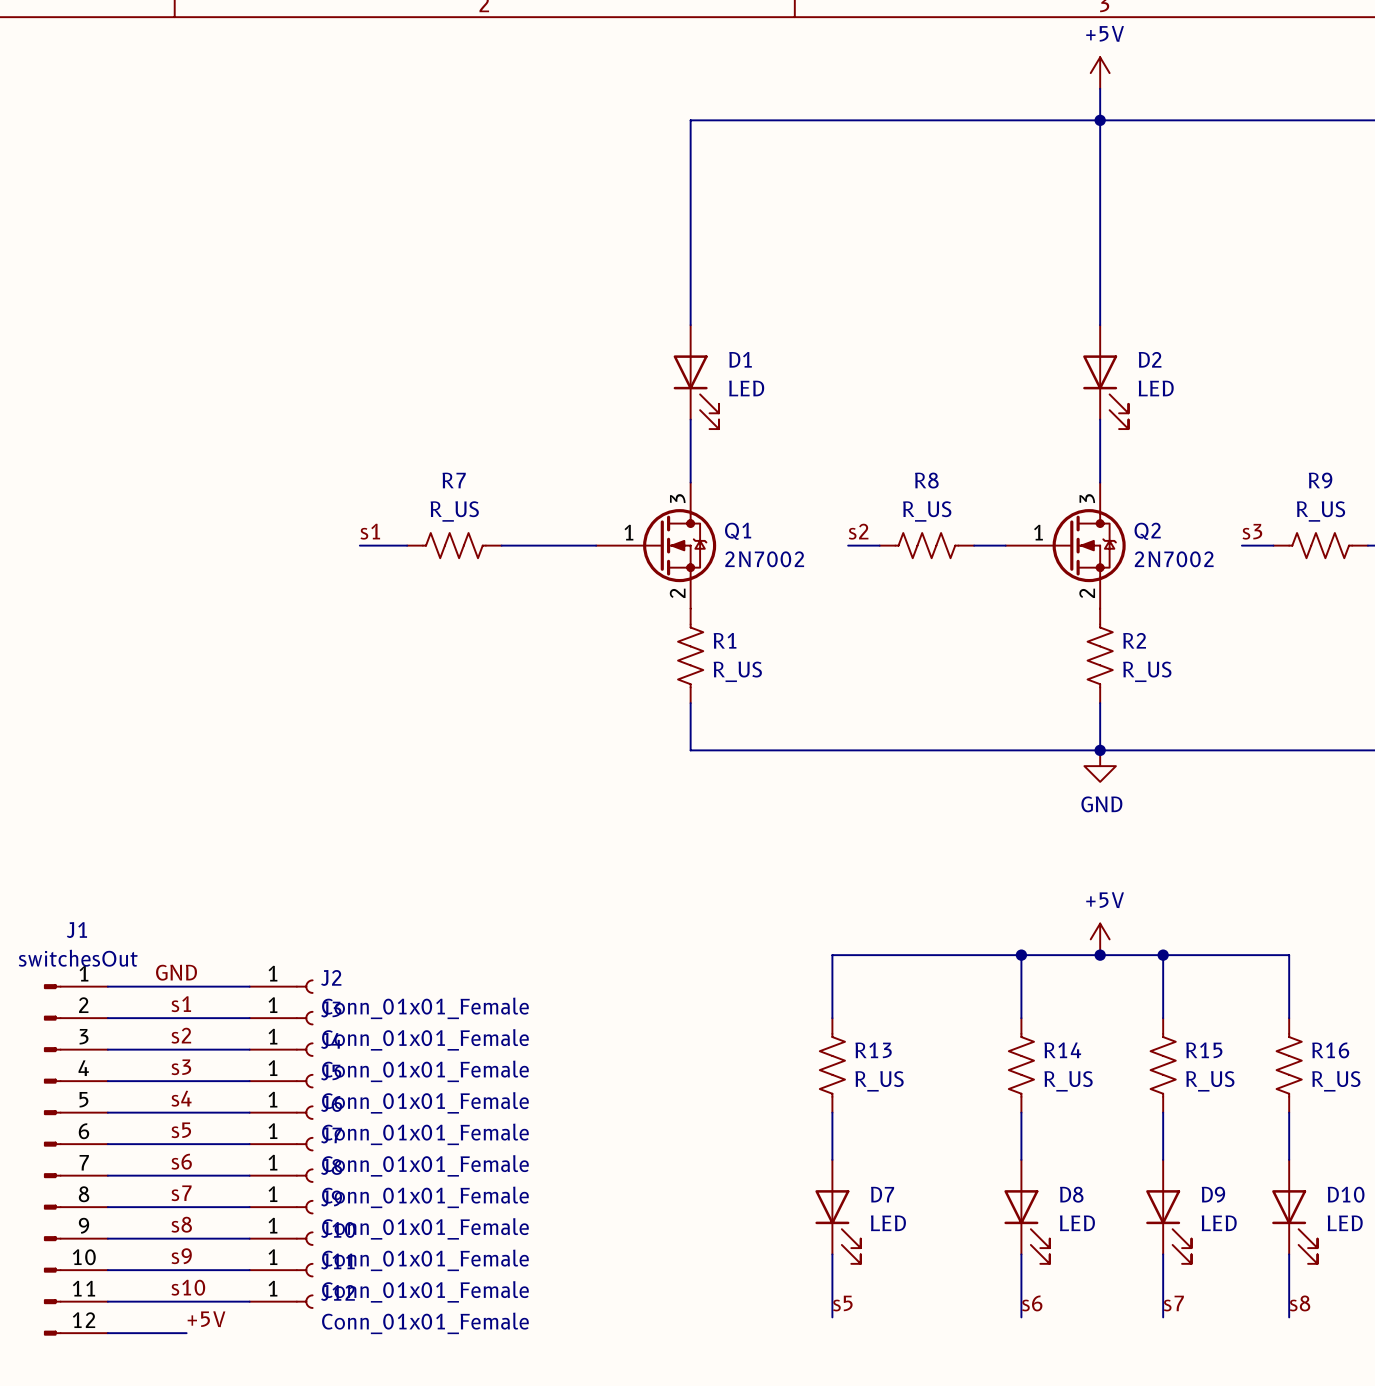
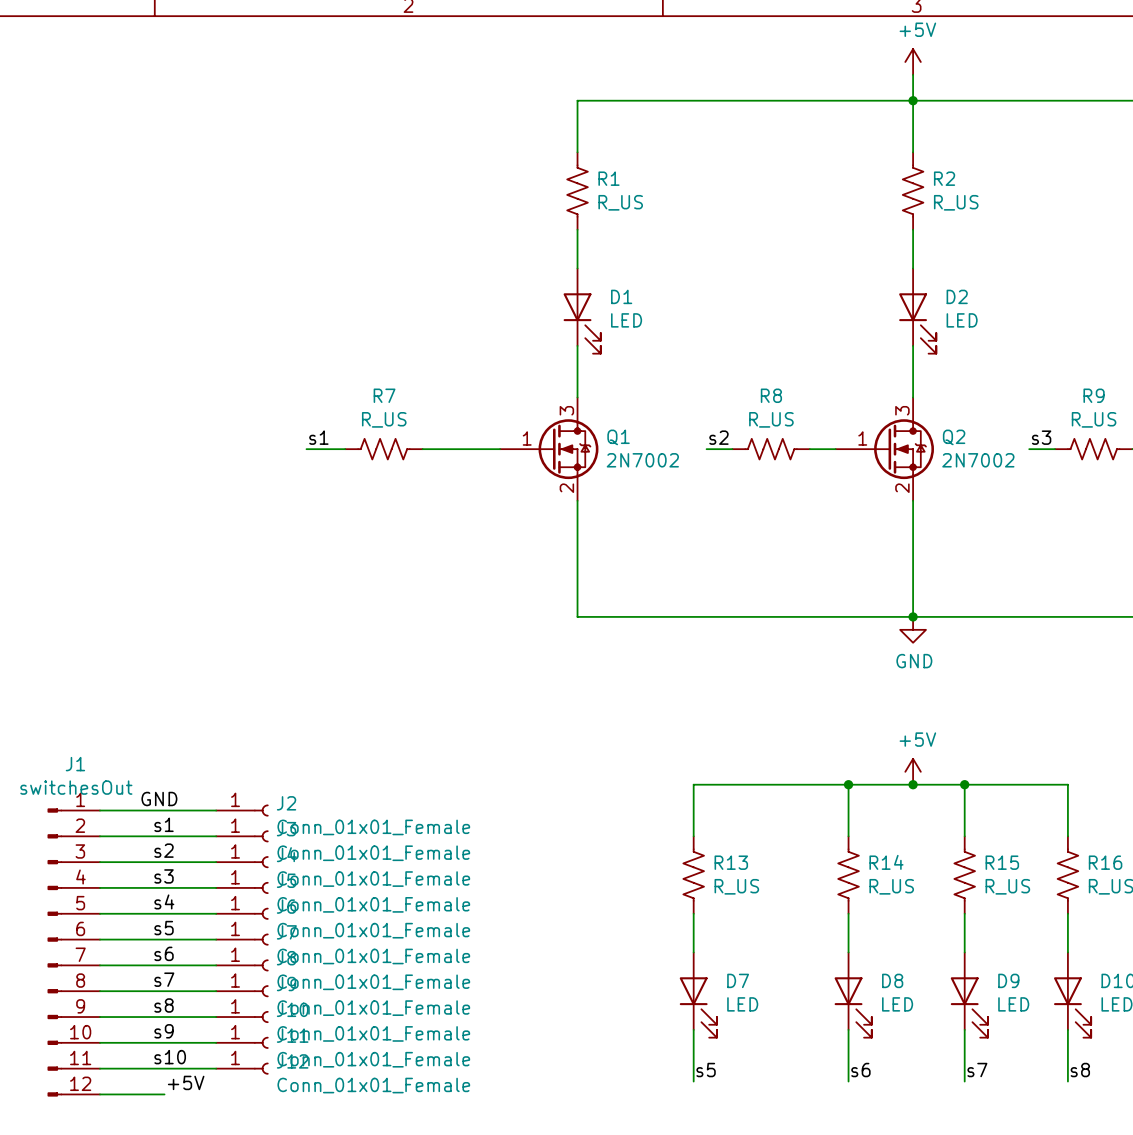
R1 position: (690, 655) -> (577, 191)
R2 position: (1100, 655) -> (913, 191)

